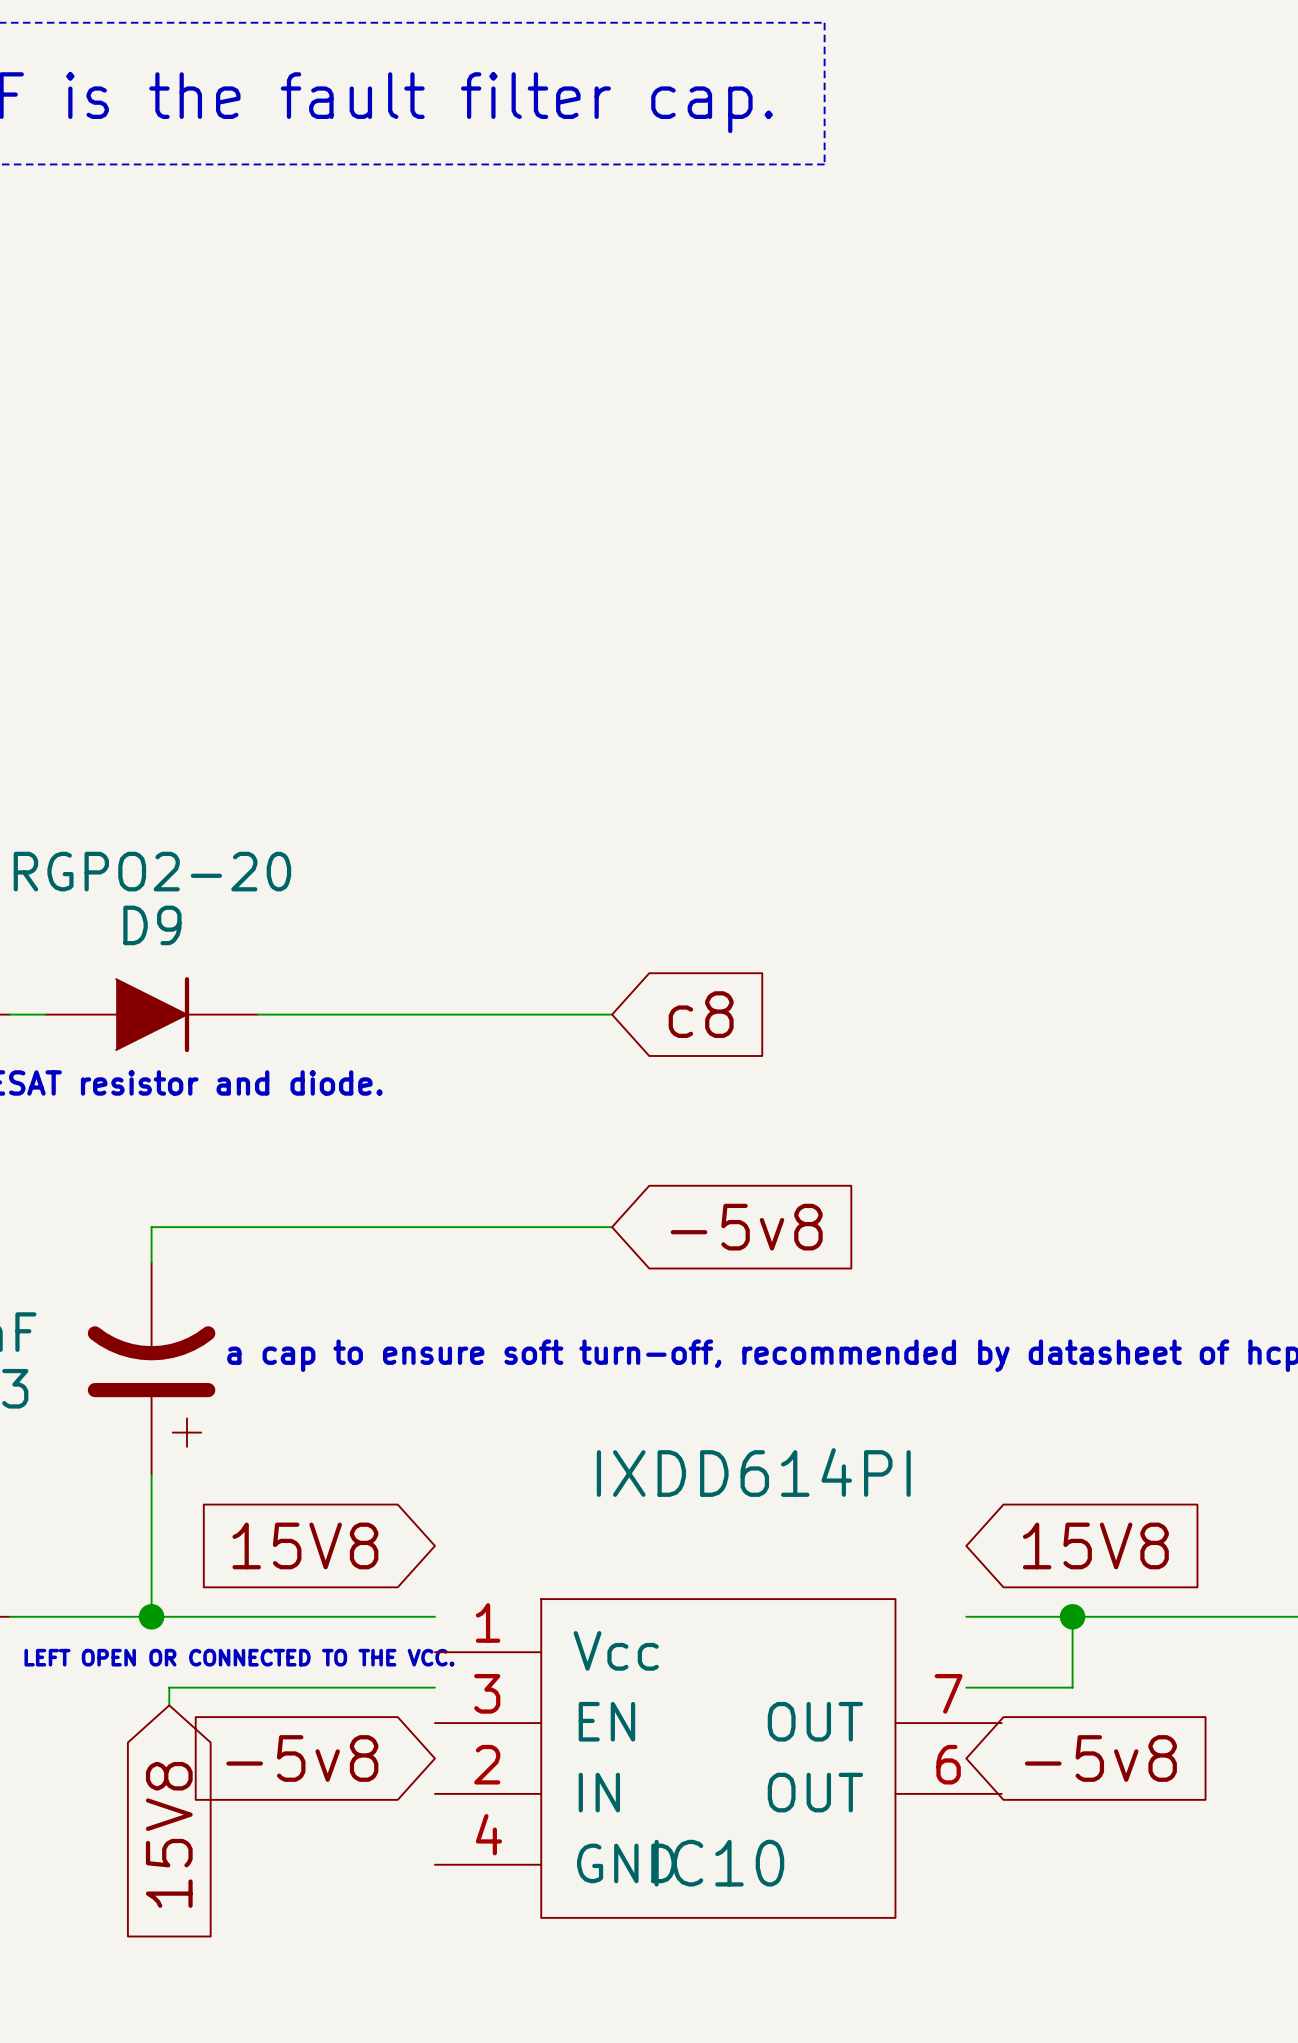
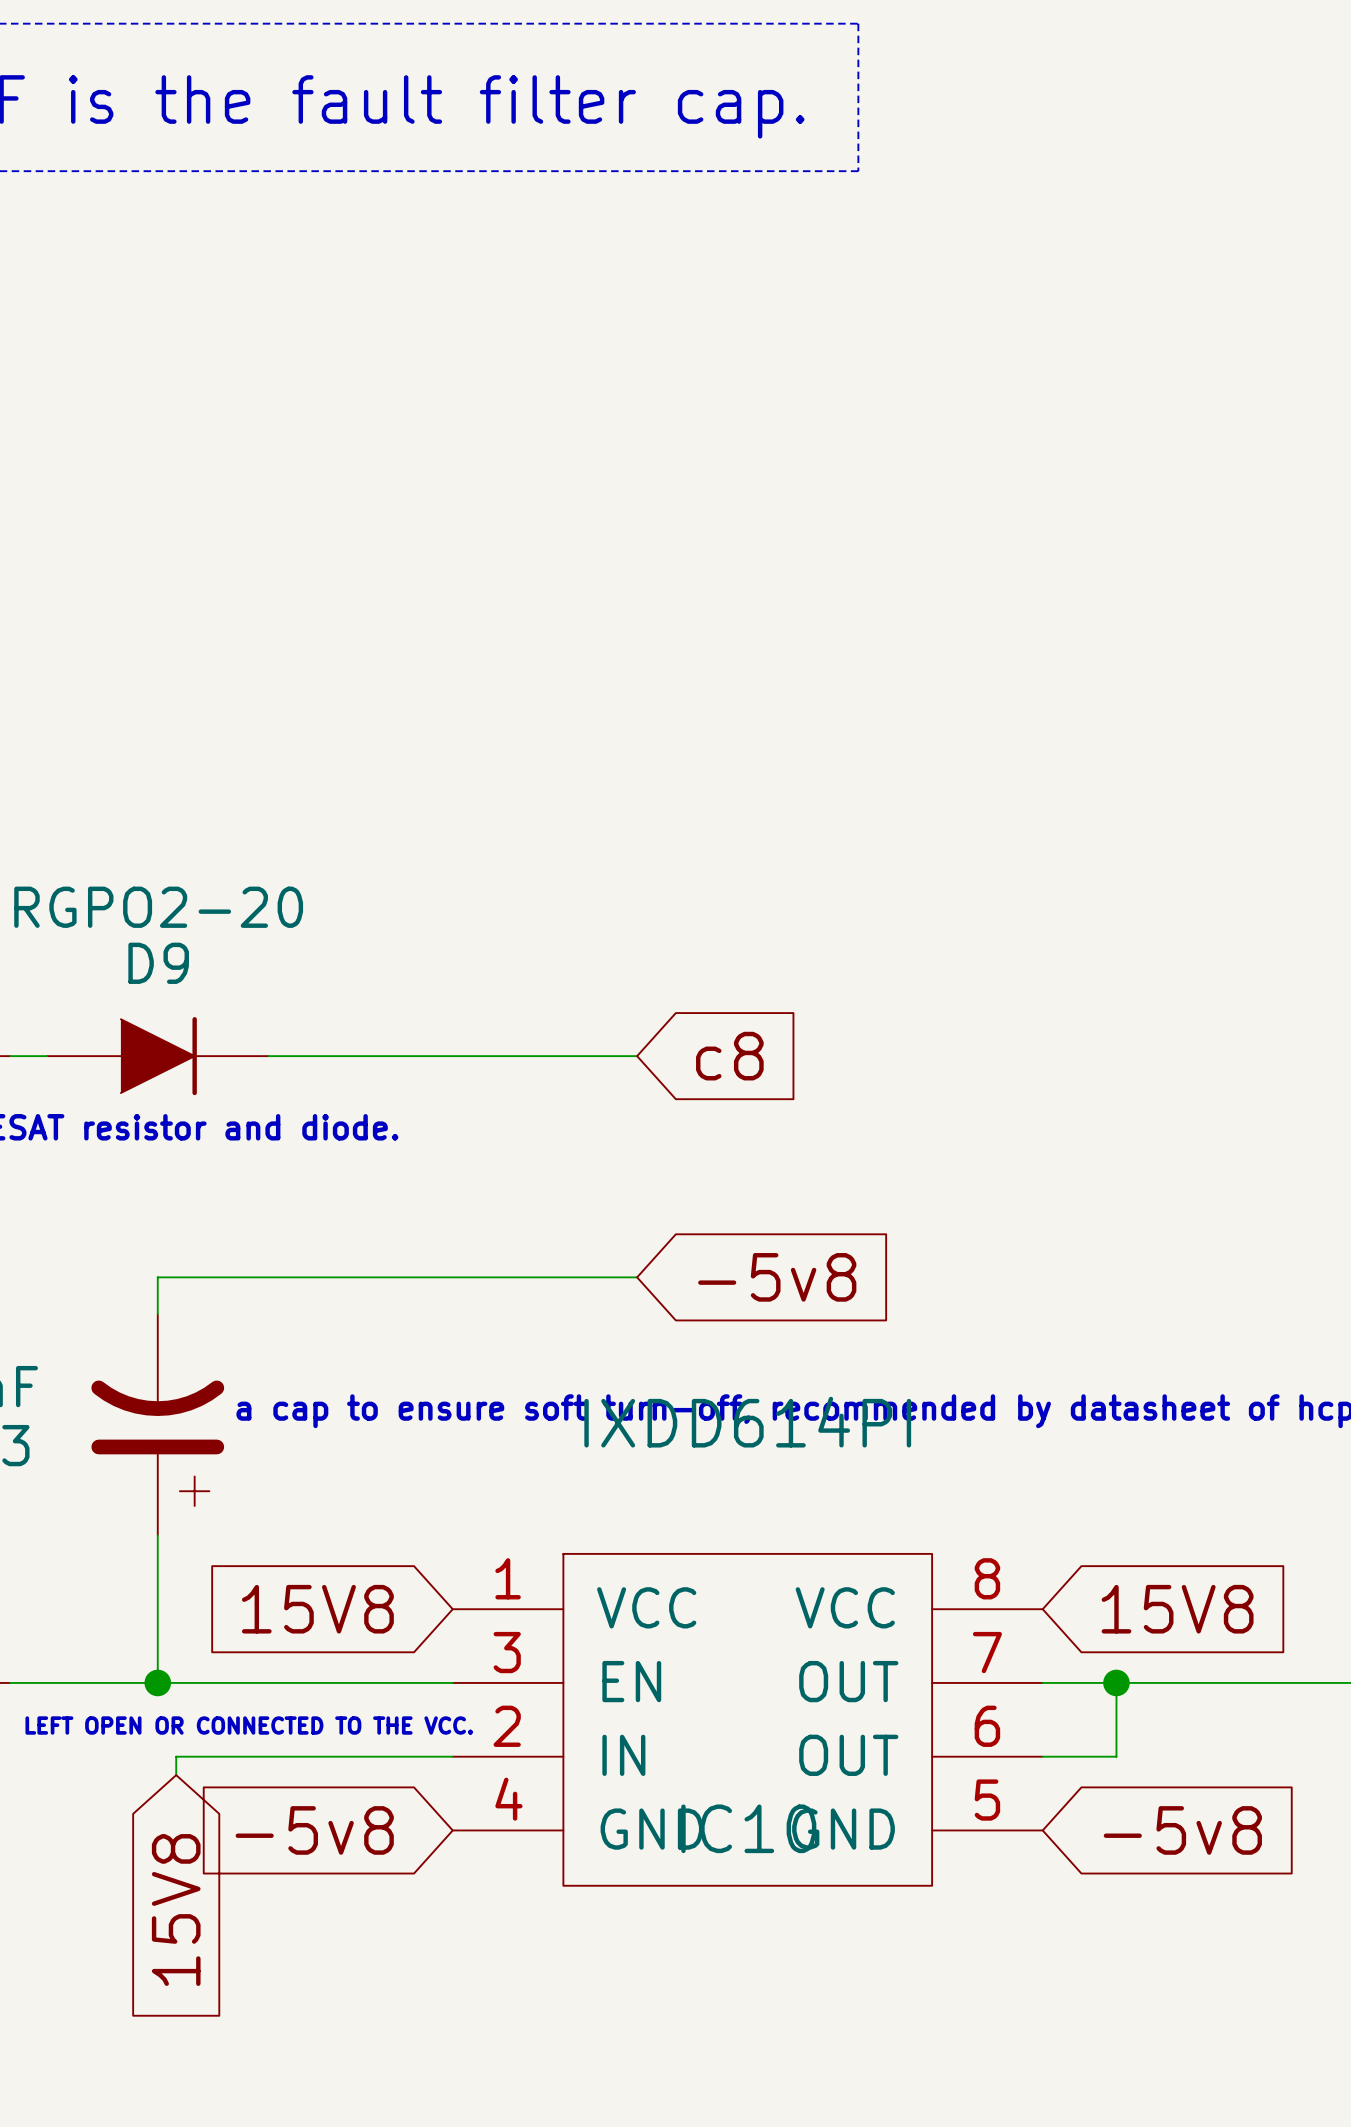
global label position: 15V8 (1095, 1545) -> 15V8 (1177, 1609)
IC10 symbol: [434, 1599, 1002, 1918] -> [452, 1553, 1043, 1886]
global label position: -5v8 (1100, 1758) -> -5v8 (1182, 1830)

